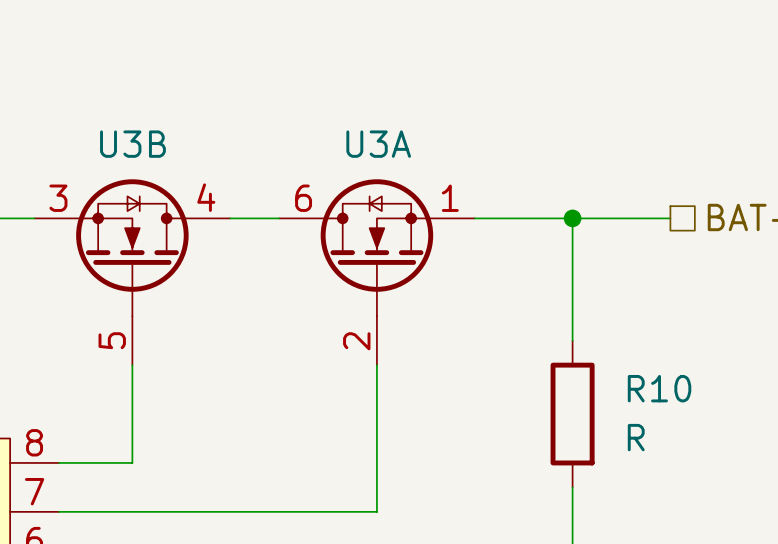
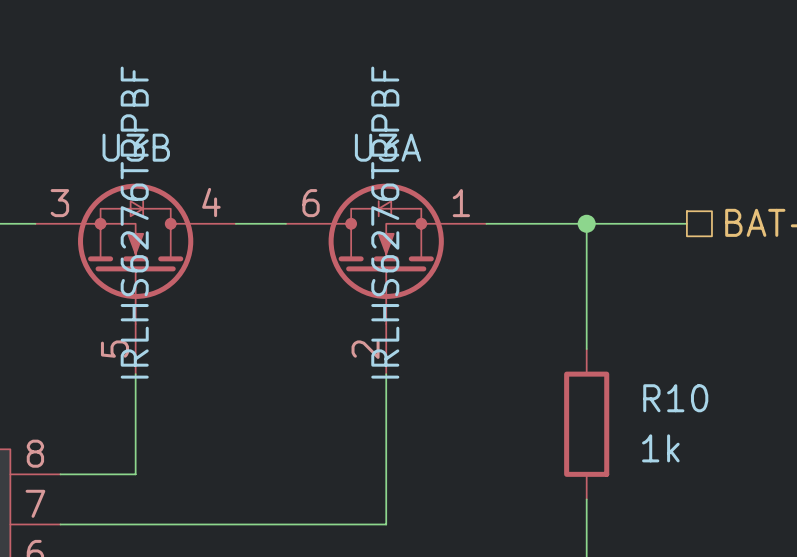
U3B value: none -> IRLHS6276TRPBF (134, 222)
U3A value: none -> IRLHS6276TRPBF (385, 222)
R10 value: R (636, 437) -> 1k (660, 448)

